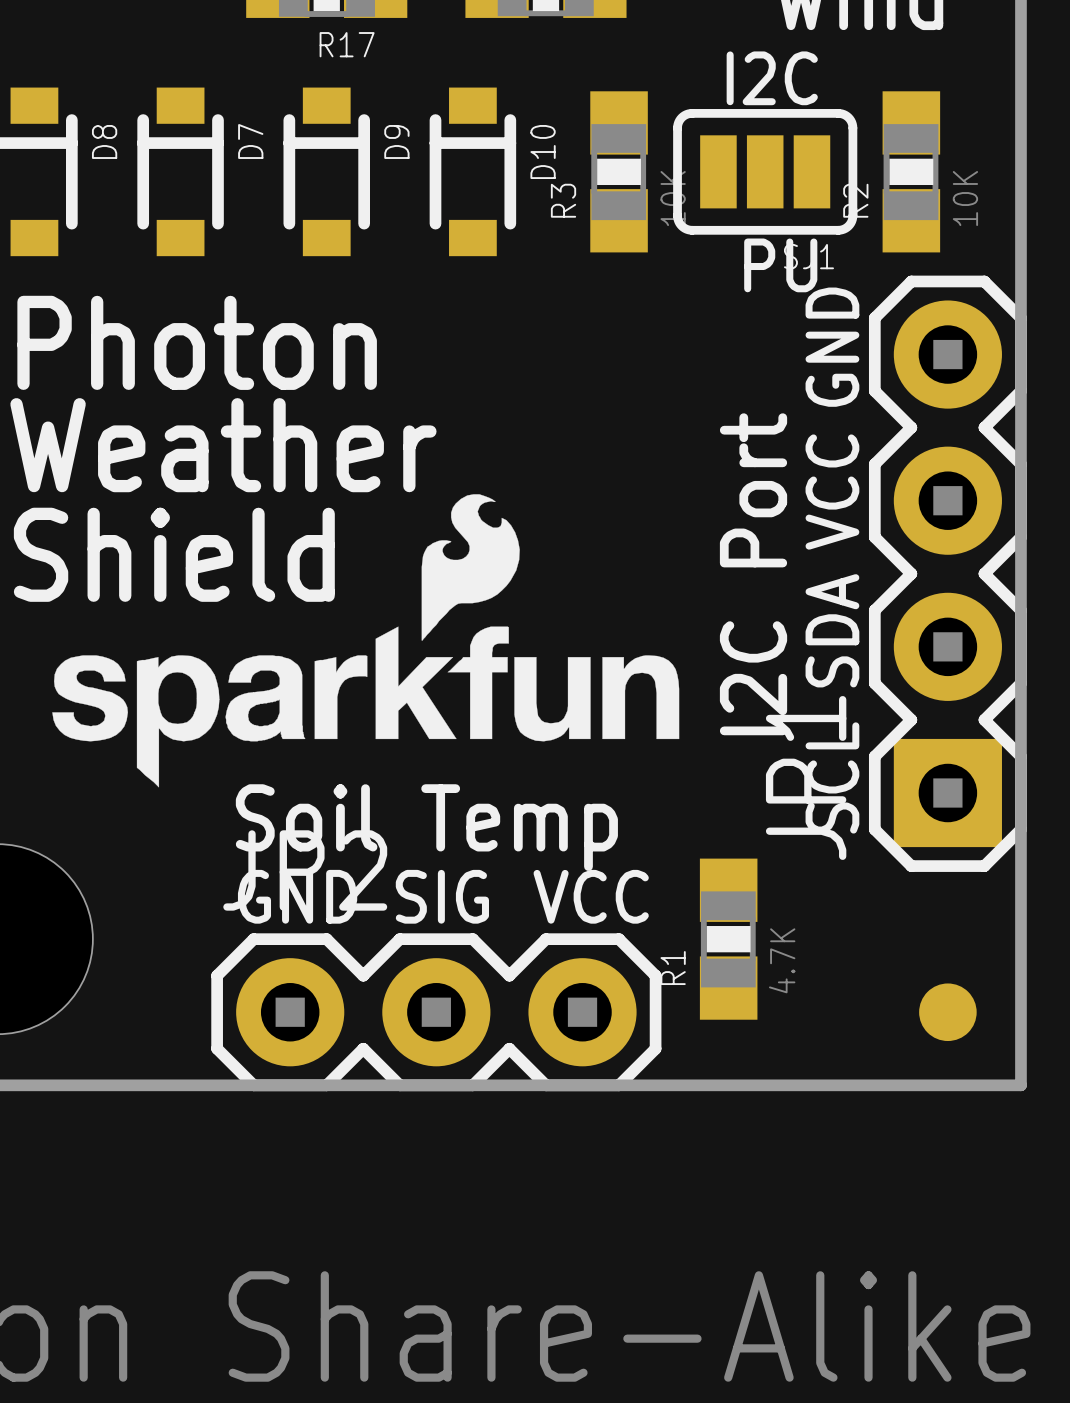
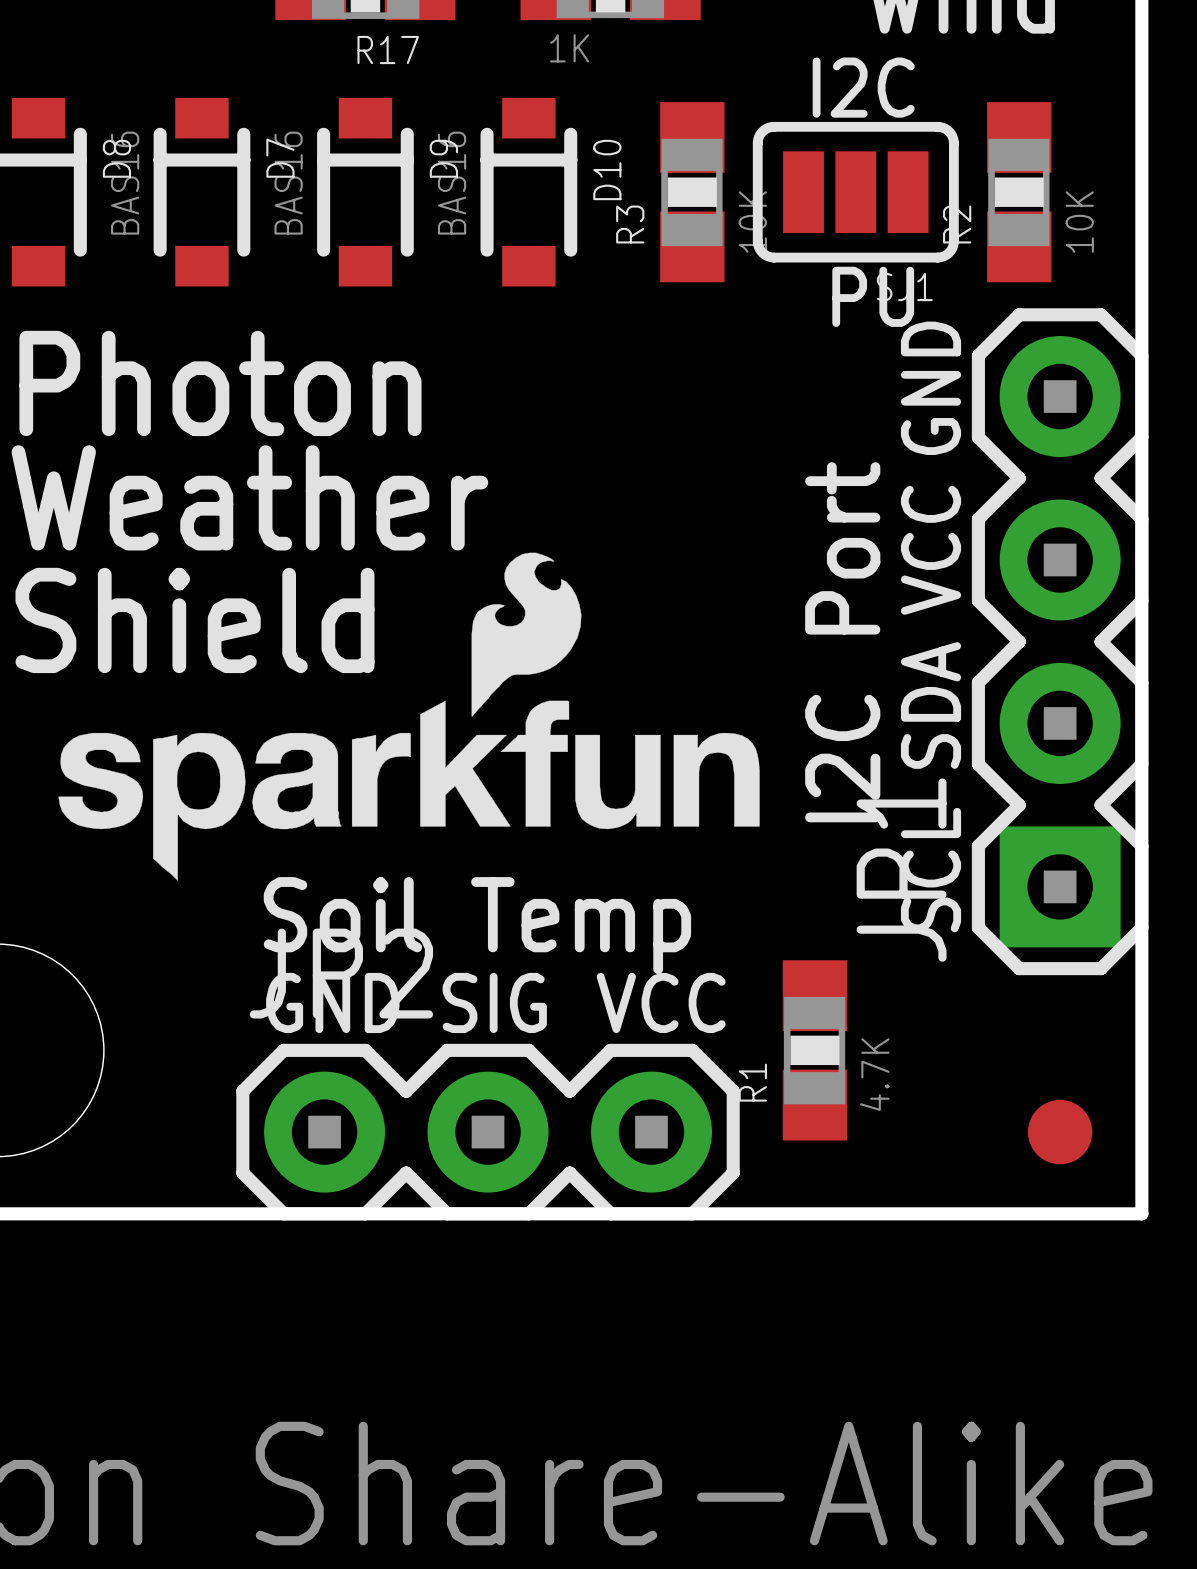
part value: none -> 1K (569, 48)
D7 value: none -> BAS16 (125, 183)
D9 value: none -> BAS16 (288, 183)
D10 value: none -> BAS16 (452, 183)

